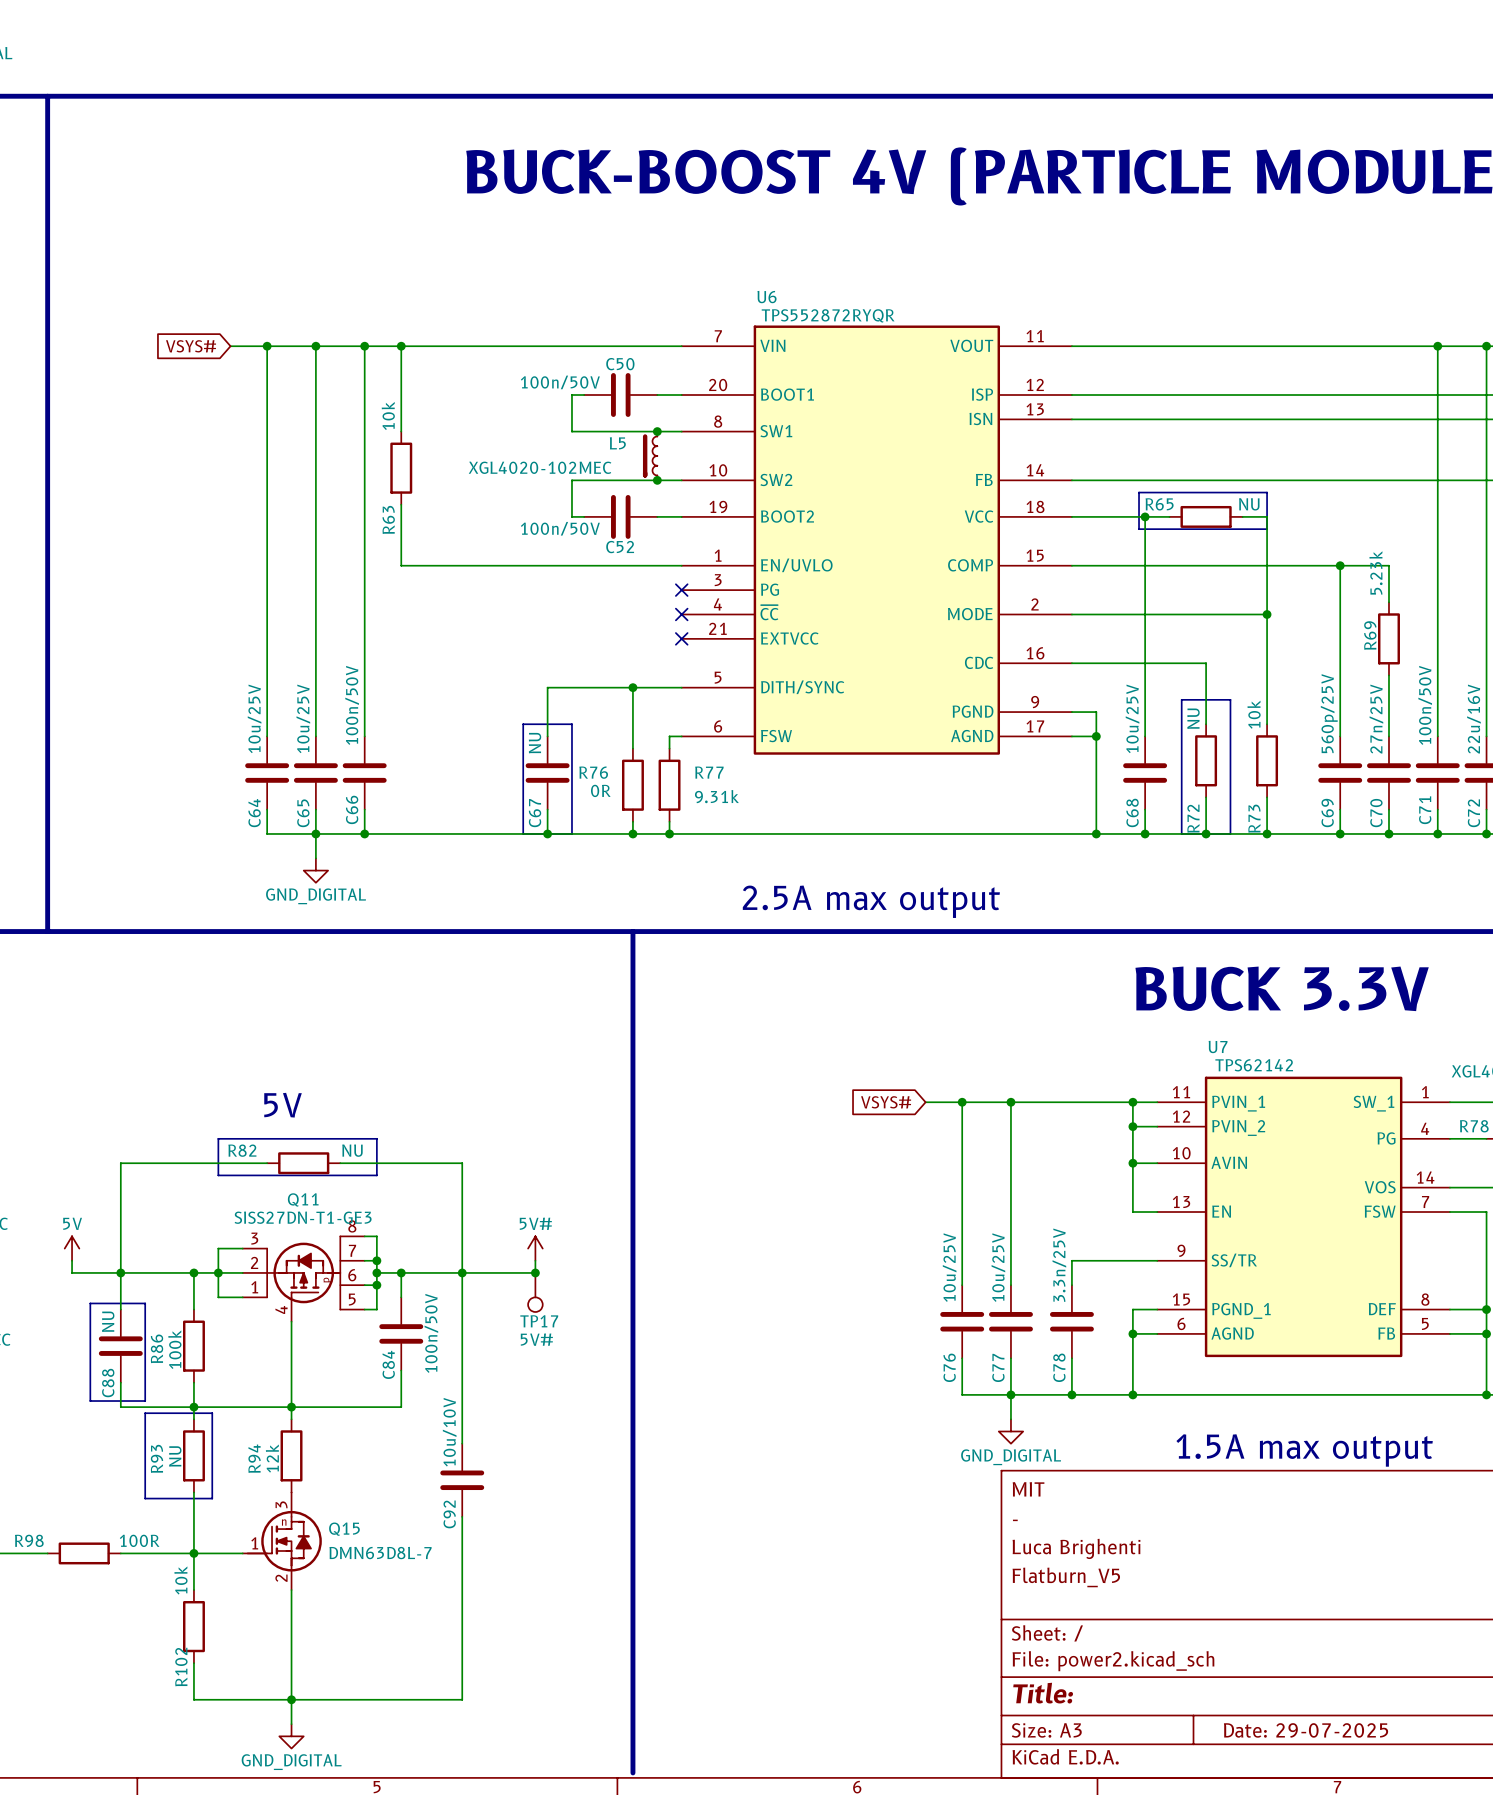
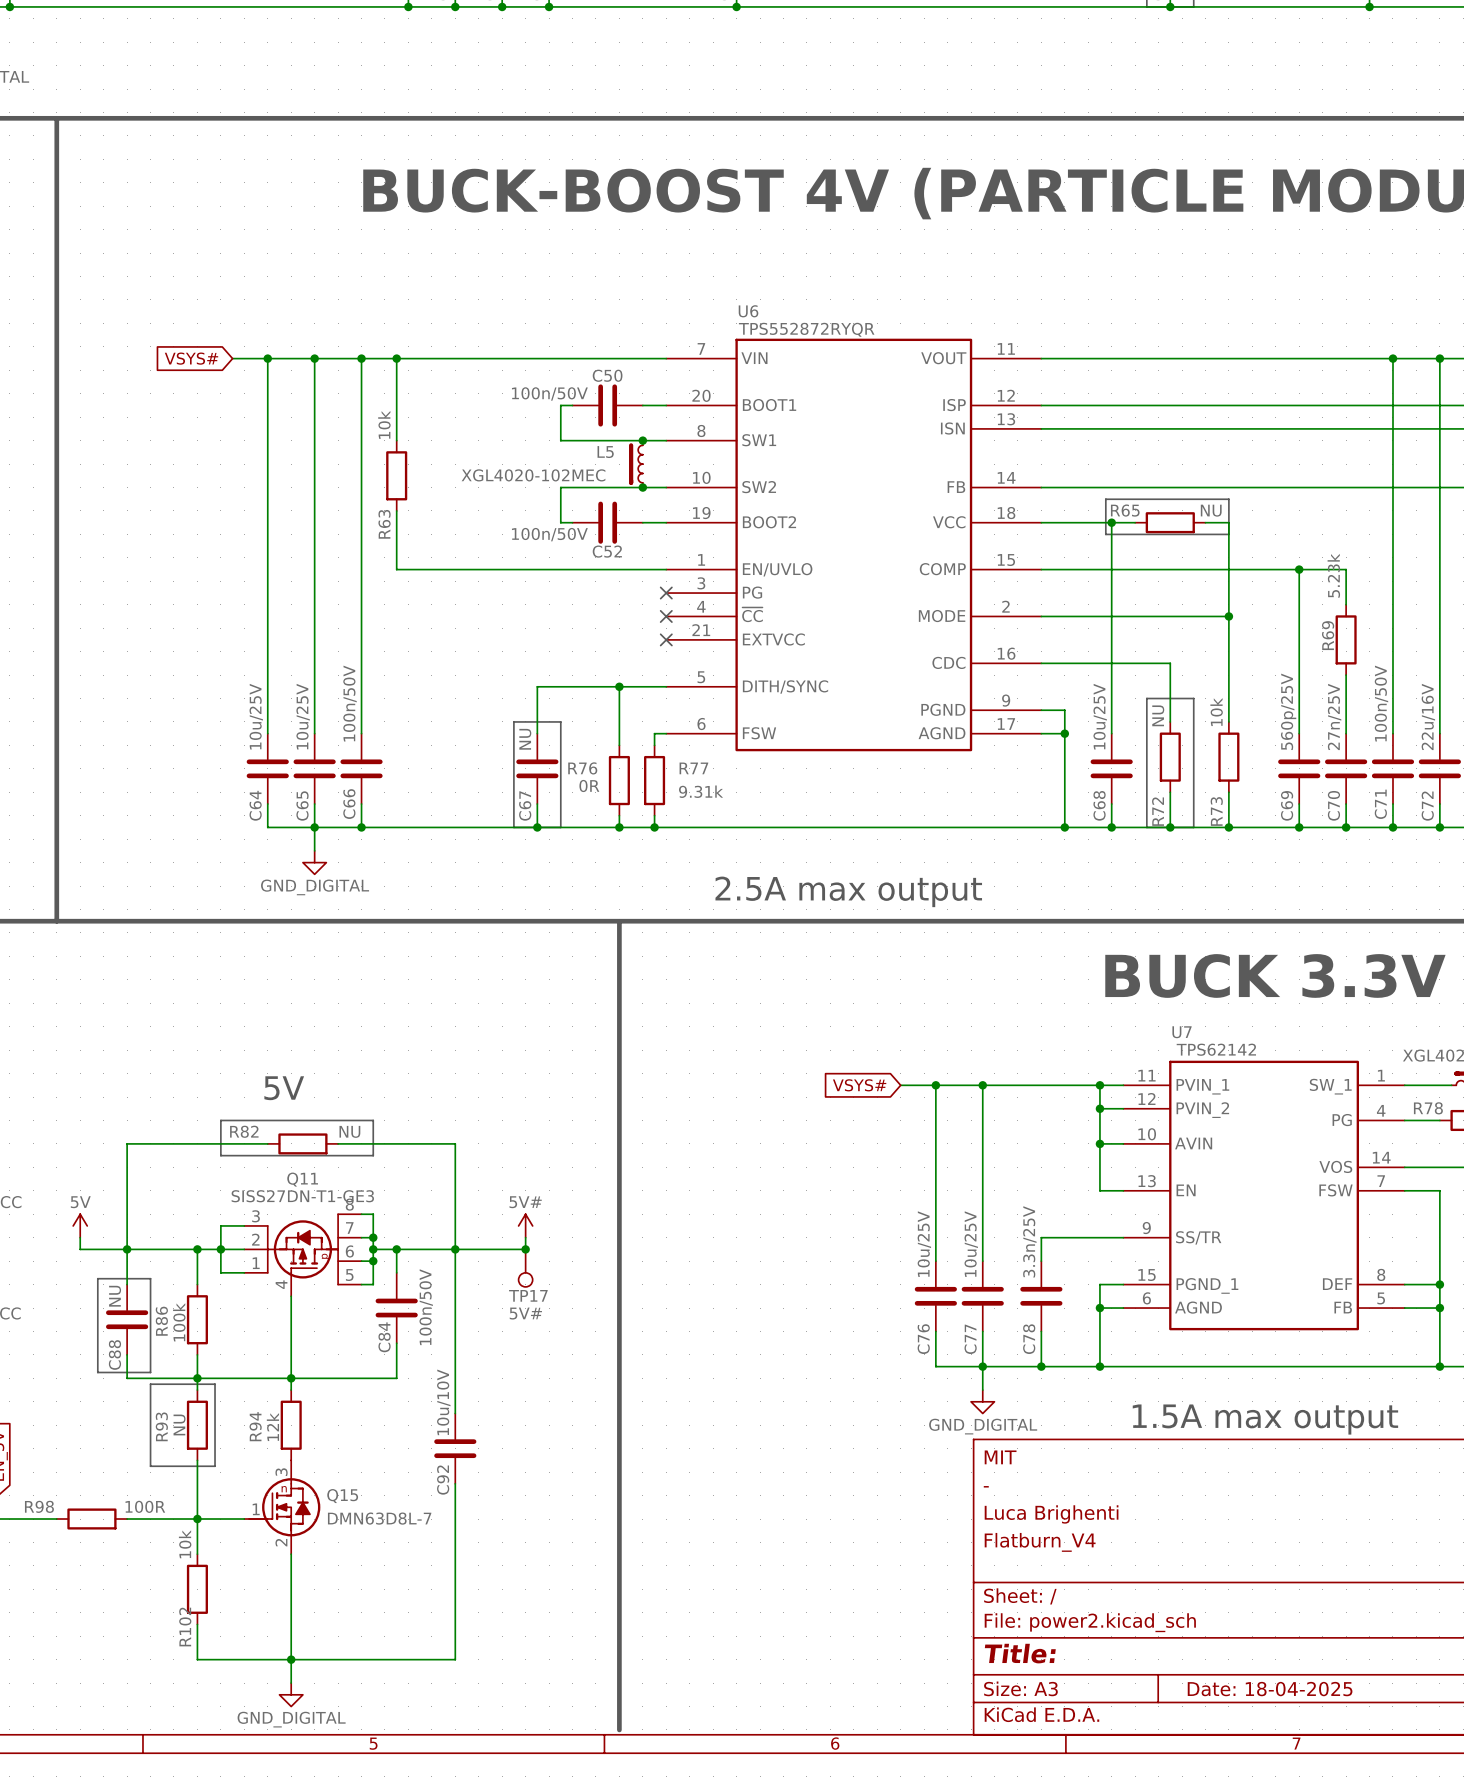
title block: Flatburn_V5 (1066, 1577) -> Flatburn_V4 (1040, 1542)
title block: Date: 29-07-2025 (1306, 1730) -> Date: 18-04-2025 (1270, 1689)

